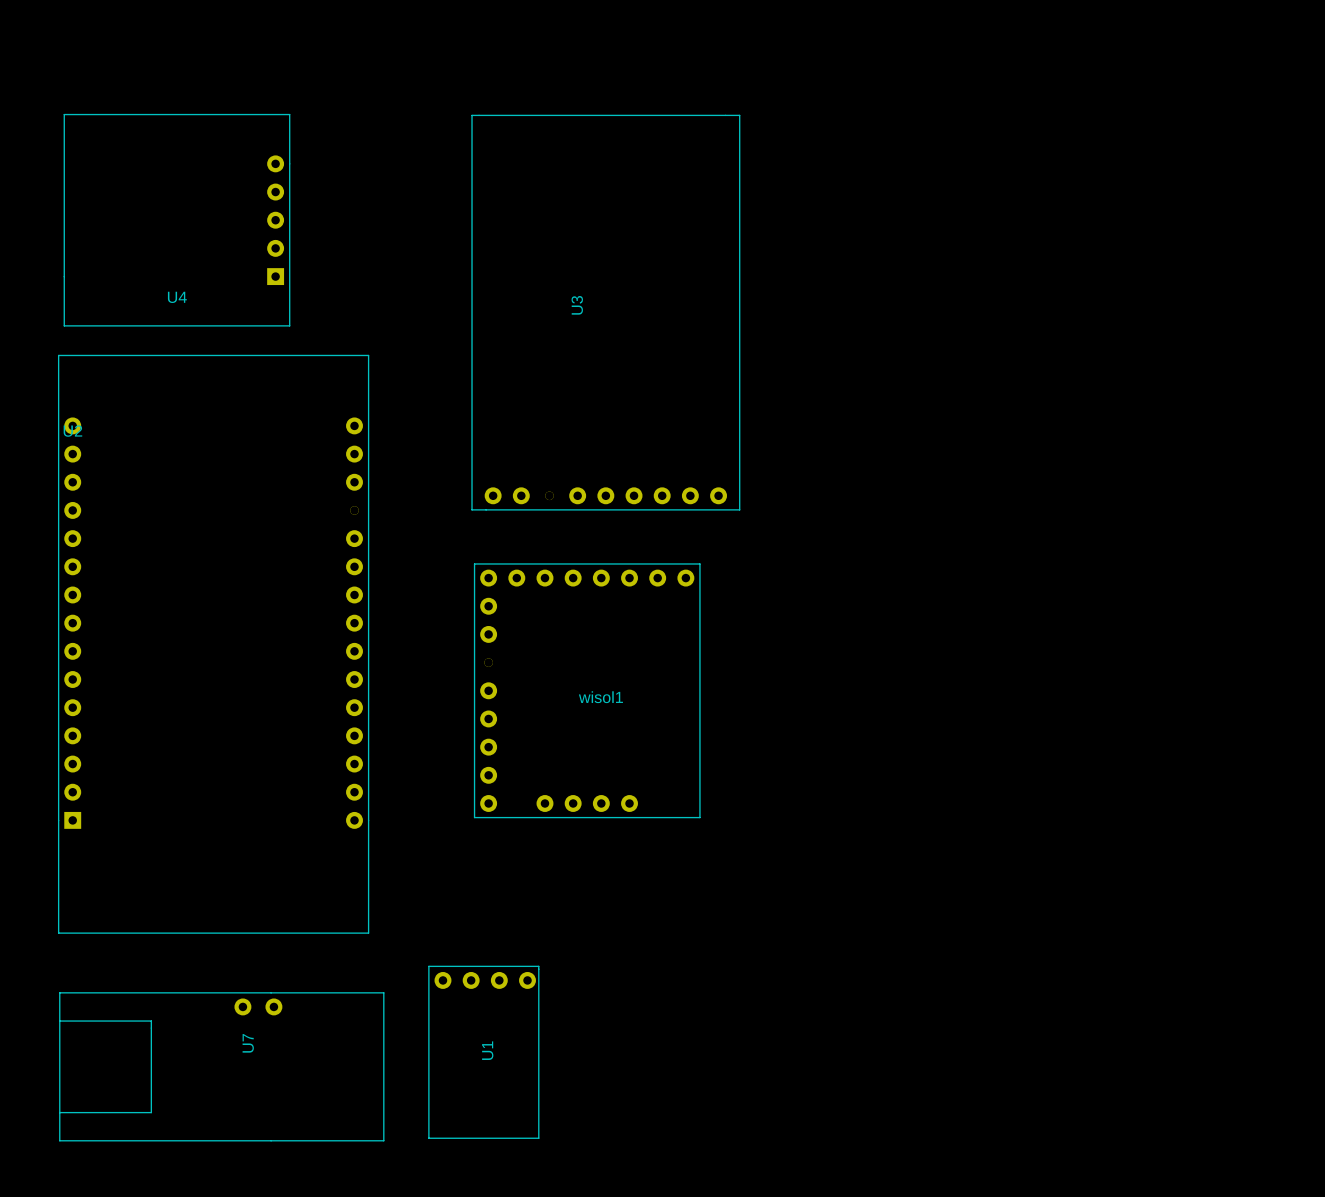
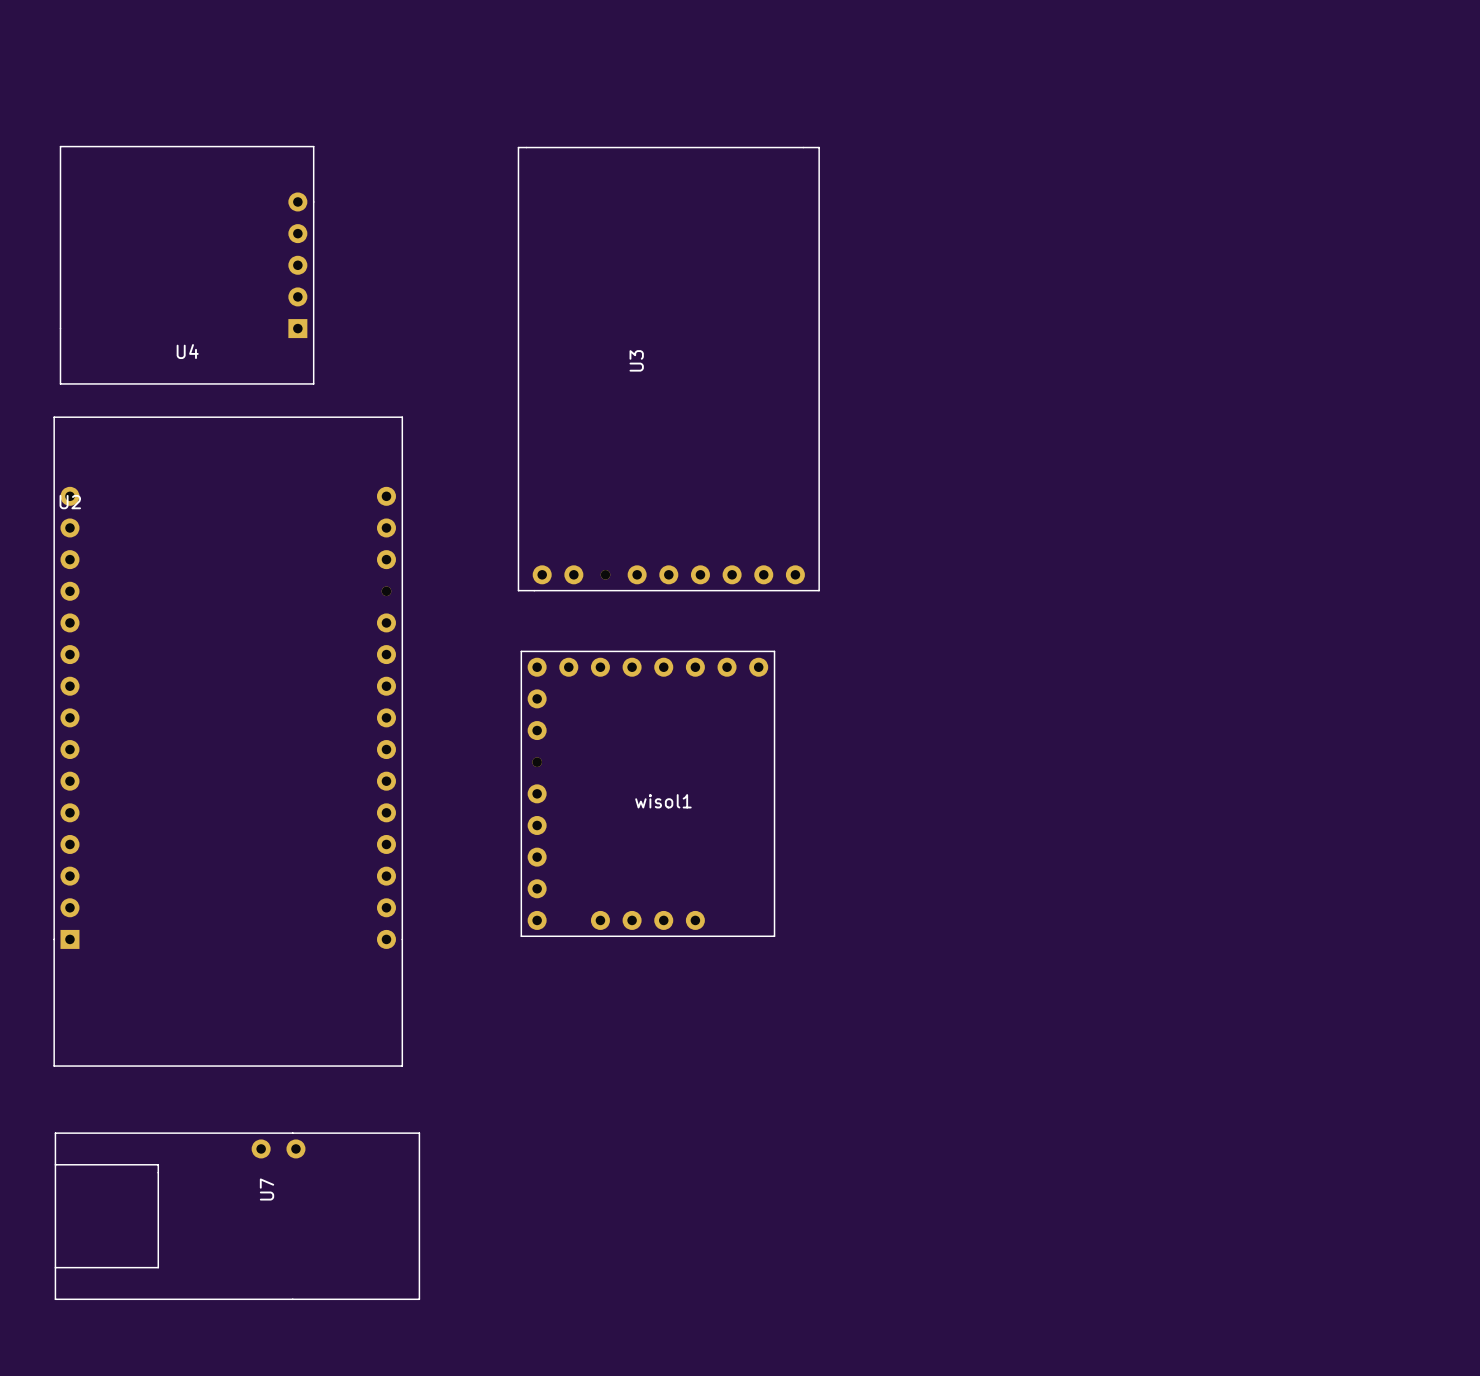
U1: (483, 1052) -> none

